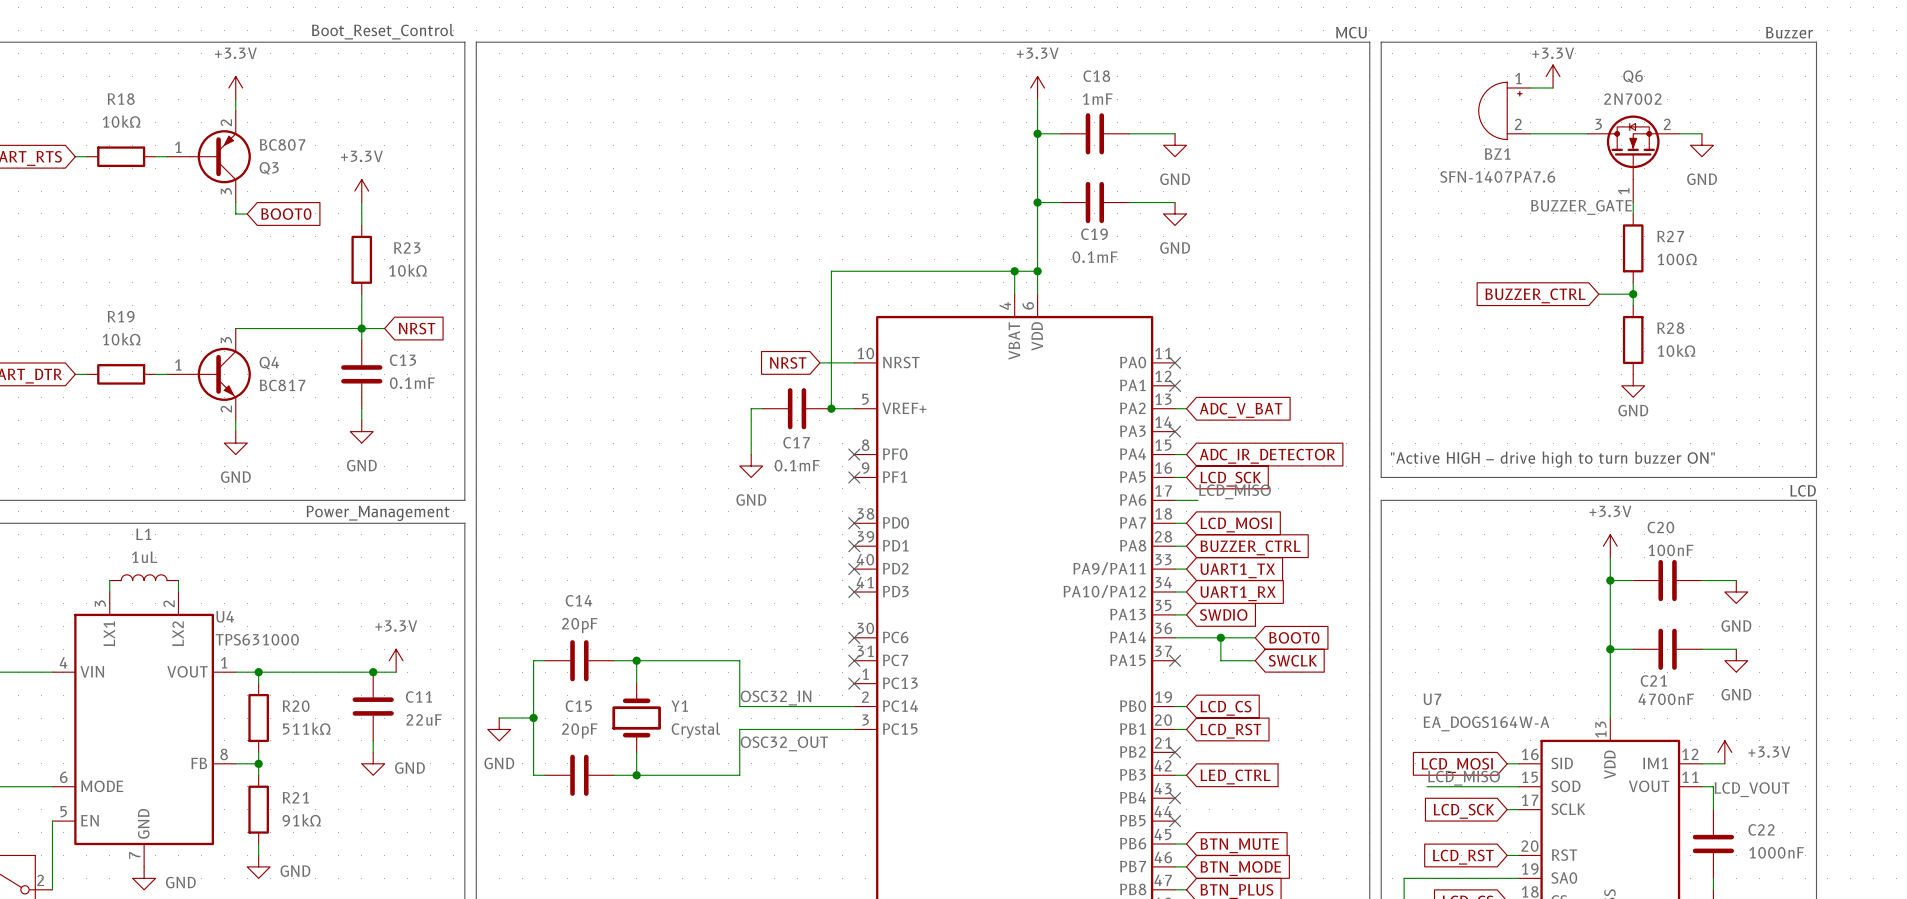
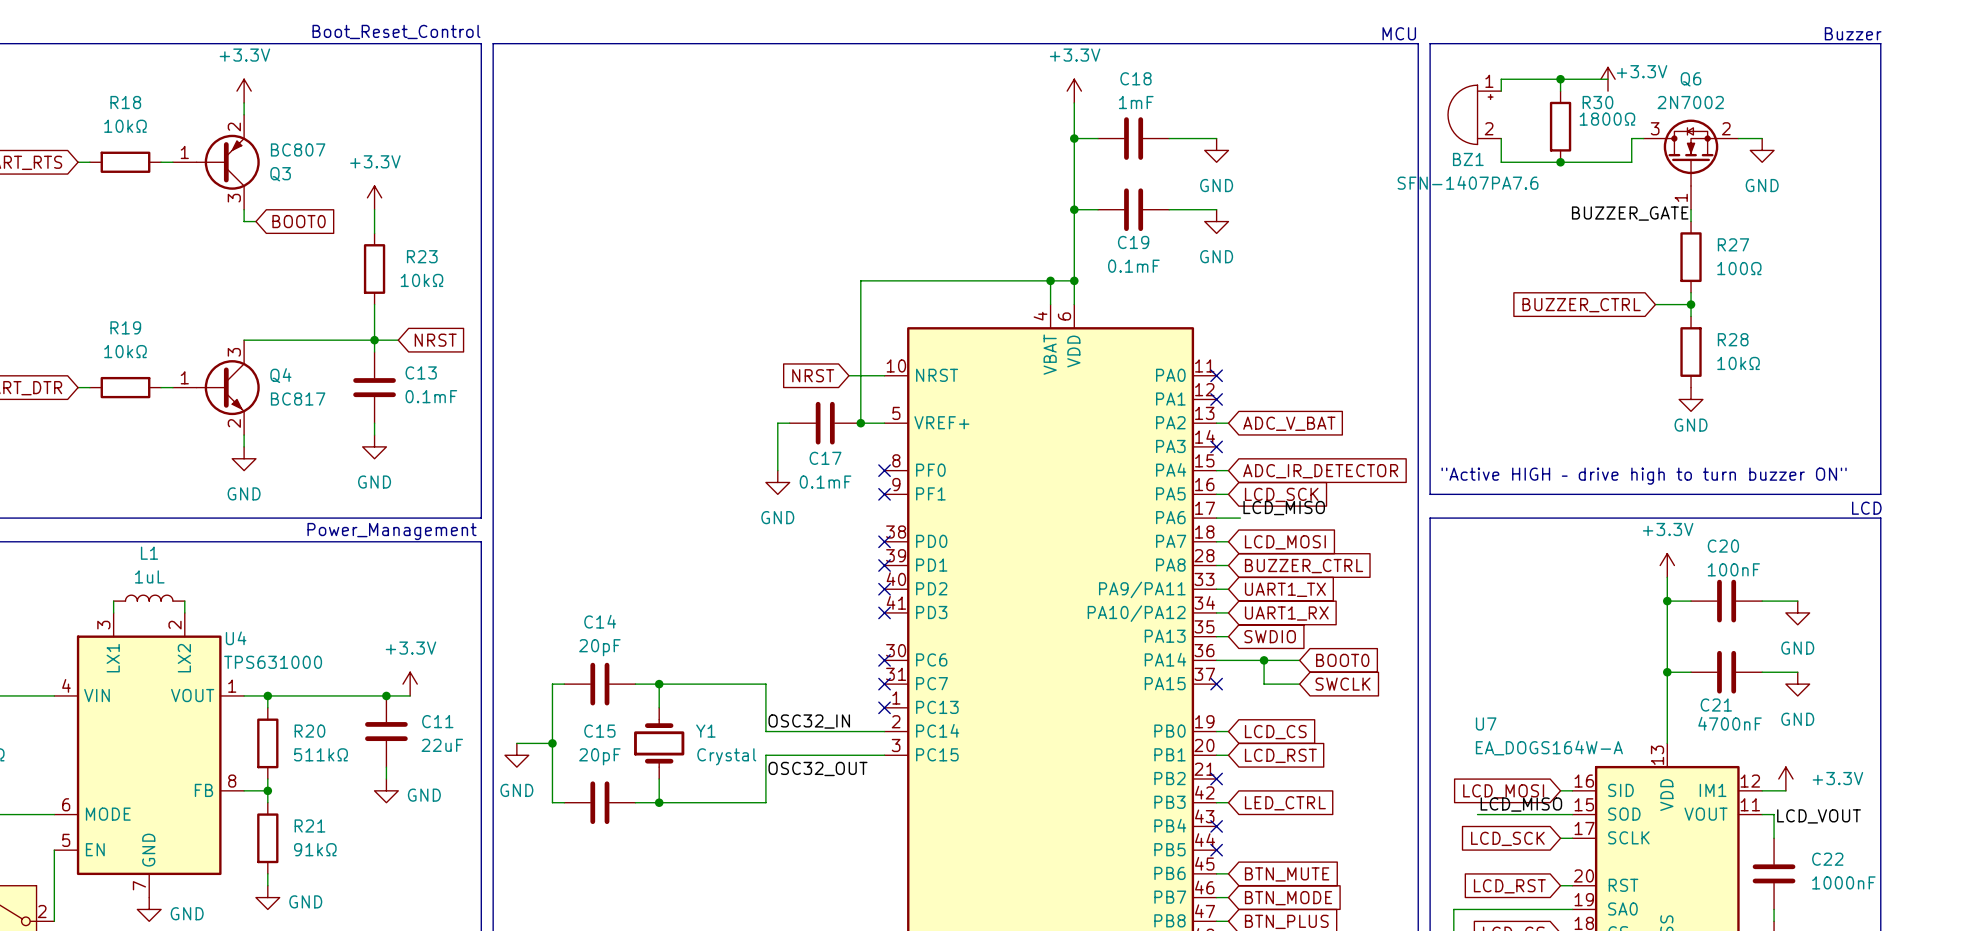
power symbol text position: +3.3V (1553, 53) -> +3.3V (1642, 71)
junction: none -> (1560, 79)
wire: none -> (1607, 79) (1501, 79) (1501, 91)
wire: (1530, 87) (1553, 87) -> none
BZ1 position: (1504, 110) -> (1474, 114)
R30: none -> 1800Ω (1560, 126)
wire: (1530, 133) (1575, 133) -> (1501, 138) (1501, 162) (1631, 162) (1631, 138)
junction: none -> (1560, 162)

